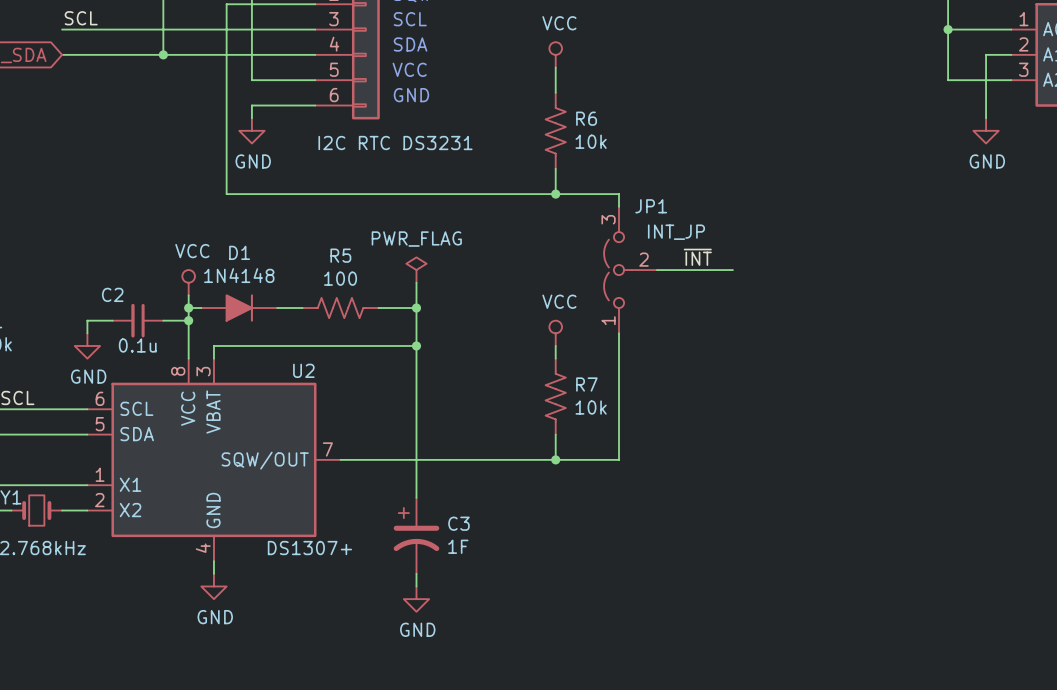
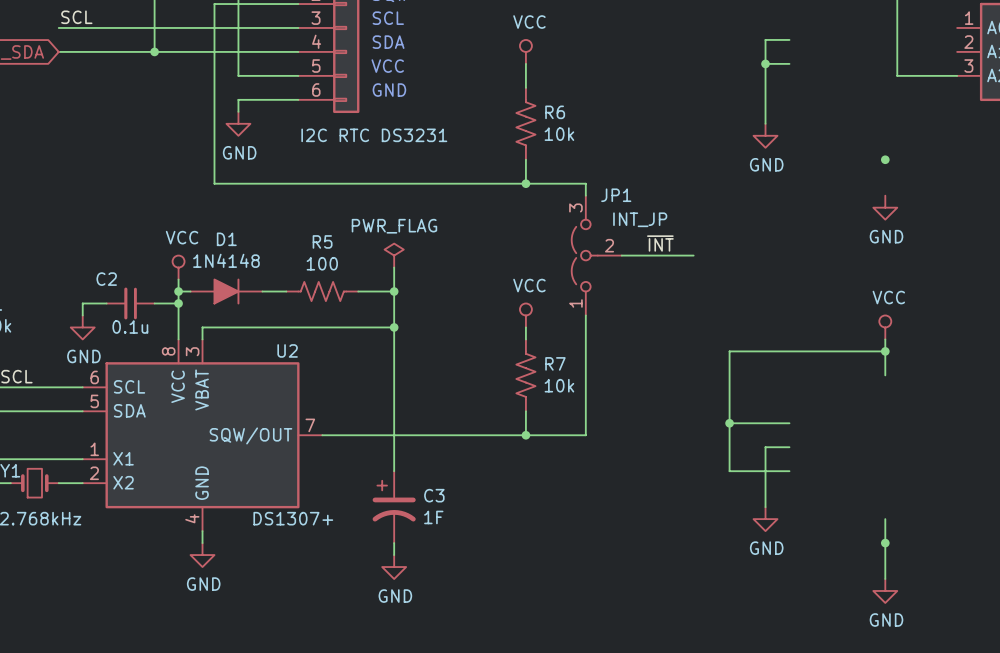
wire: (948, 29) (1011, 29) -> none
junction: (948, 29) -> none
wire: none -> (789, 39) (765, 39) (765, 123)
wire: (1011, 54) (986, 54) (986, 118) -> none
wire: none -> (765, 63) (789, 63)
junction: none -> (765, 63)
power symbol: GND (986, 130) -> none
power symbol: none -> GND (765, 135)
junction: none -> (885, 159)
power symbol: none -> GND (885, 207)
power symbol: none -> VCC (885, 327)
wire: none -> (885, 339) (885, 375)
wire: none -> (885, 351) (729, 351) (729, 471) (789, 471)
junction: none -> (885, 351)
wire: none -> (729, 423) (789, 423)
junction: none -> (729, 423)
wire: none -> (789, 447) (765, 447) (765, 507)
power symbol: none -> GND (765, 519)
wire: none -> (885, 519) (885, 579)
junction: none -> (885, 543)
power symbol: none -> GND (885, 590)

